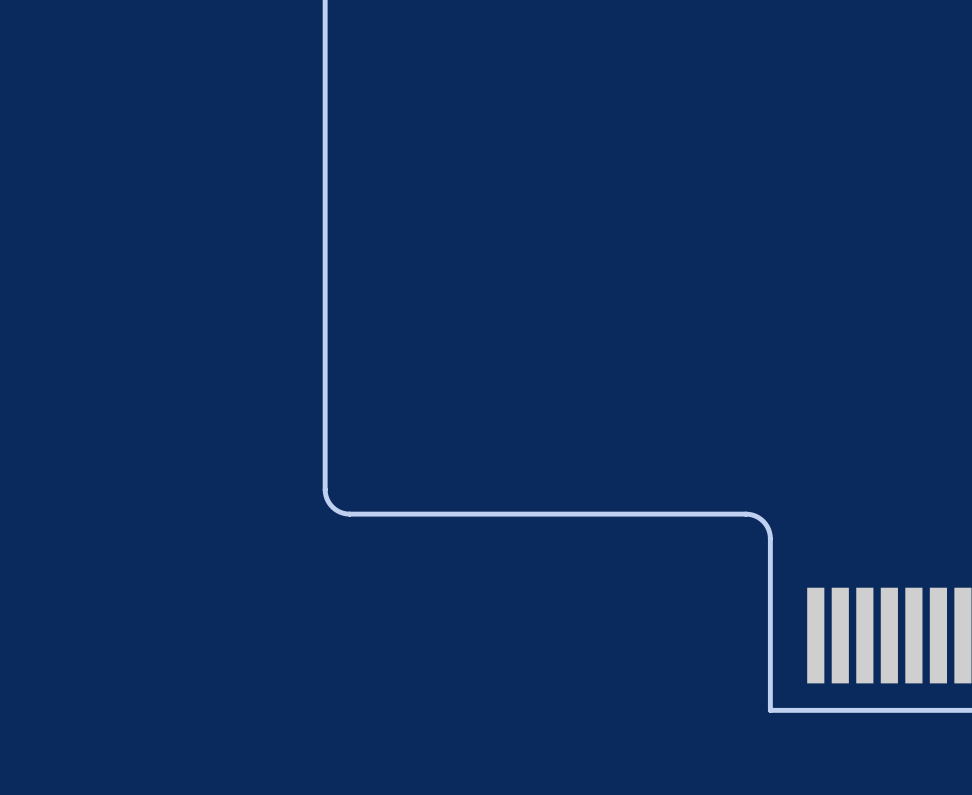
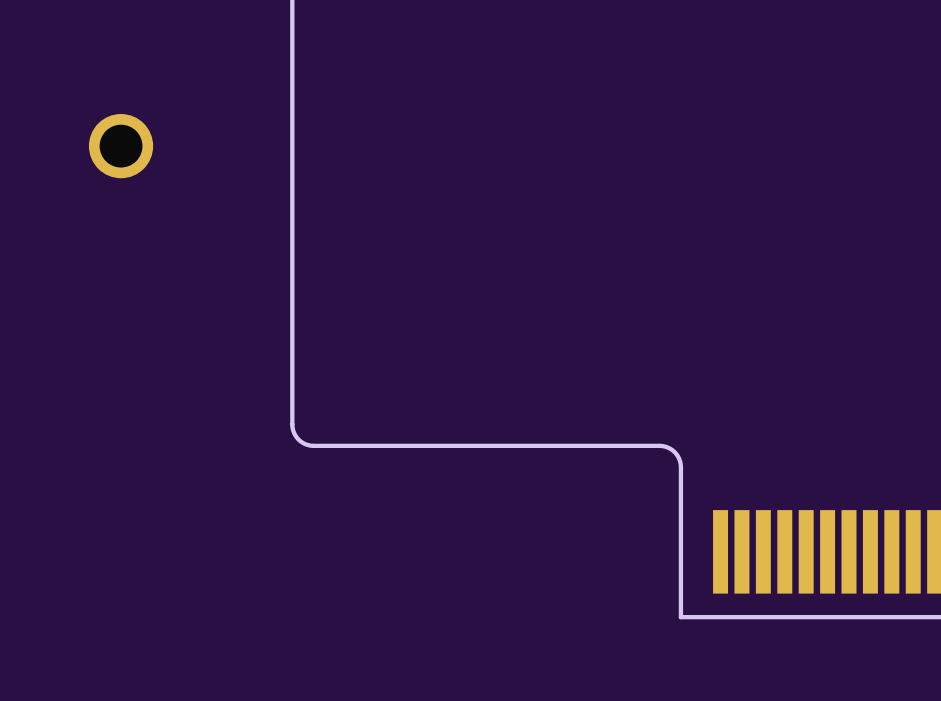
part: none -> (121, 146)

